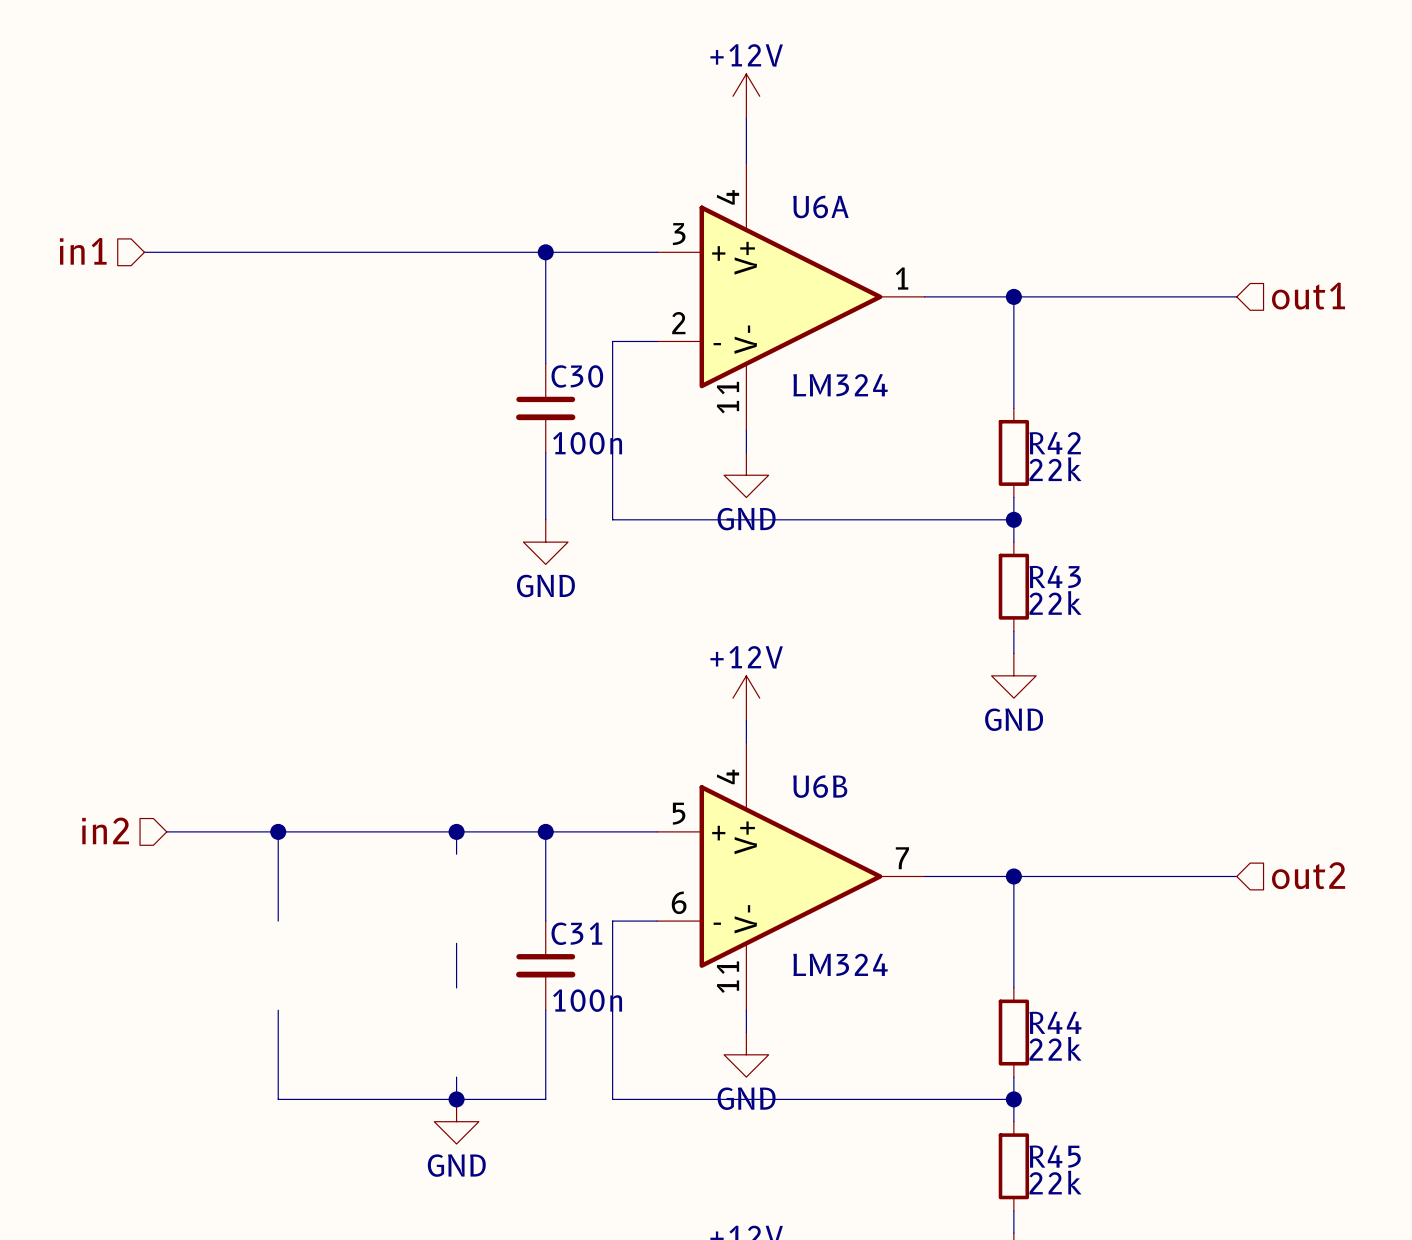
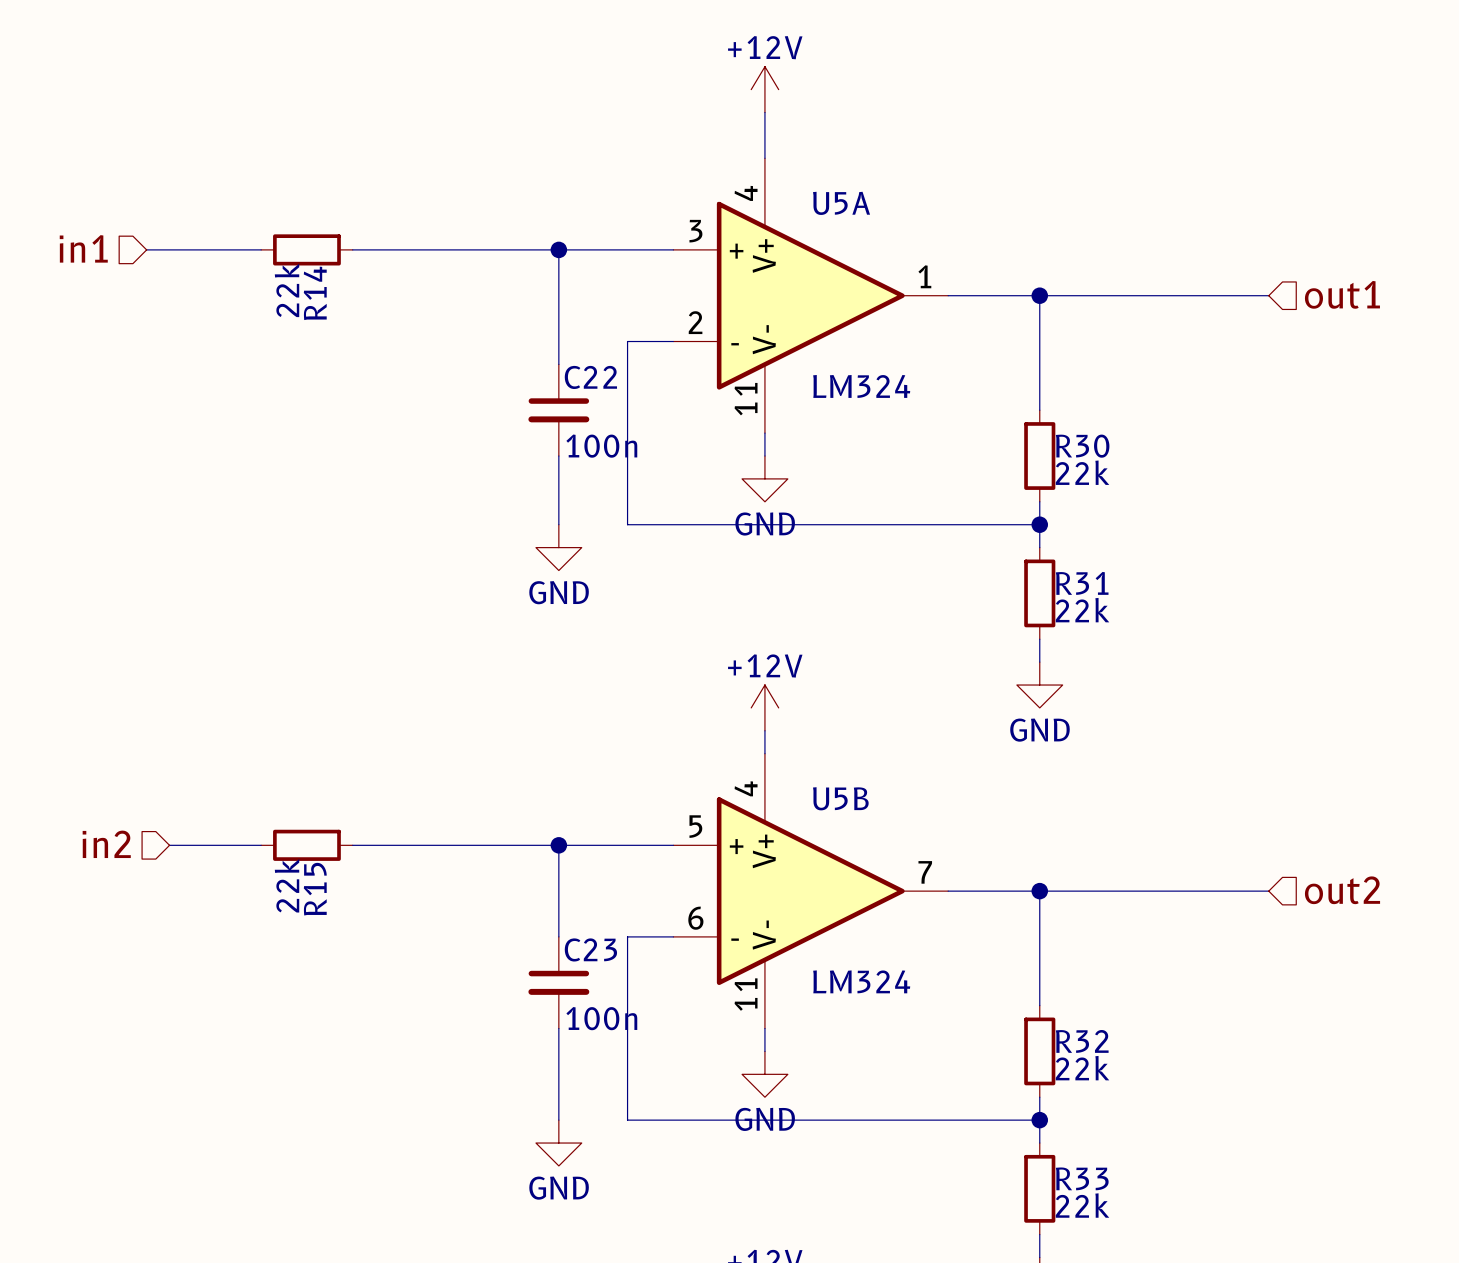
U6A name: U6A (820, 207) -> U5A (841, 203)
wire: (255, 252) (345, 252) -> none
R14: none -> 22k (306, 249)
C30 name: C30 (577, 376) -> C22 (590, 377)
R42 name: R42 (1055, 443) -> R30 (1082, 446)
R43 name: R43 (1055, 576) -> R31 (1082, 583)
U6B name: U6B (820, 786) -> U5B (840, 798)
wire: (255, 831) (345, 831) -> none
wire: (278, 831) (278, 921) -> none
junction: (278, 831) -> none
R15: none -> 22k (306, 845)
wire: (456, 831) (456, 854) -> none
junction: (456, 831) -> none
C31 name: C31 (576, 933) -> C23 (590, 949)
wire: (456, 943) (456, 987) -> none
wire: (278, 1010) (278, 1099) (545, 1099) -> none
R44 name: R44 (1055, 1022) -> R32 (1082, 1041)
wire: (456, 1077) (456, 1099) -> none
junction: (456, 1099) -> none
power symbol position: GND (456, 1121) -> GND (558, 1143)
R45 name: R45 (1055, 1156) -> R33 (1082, 1178)

